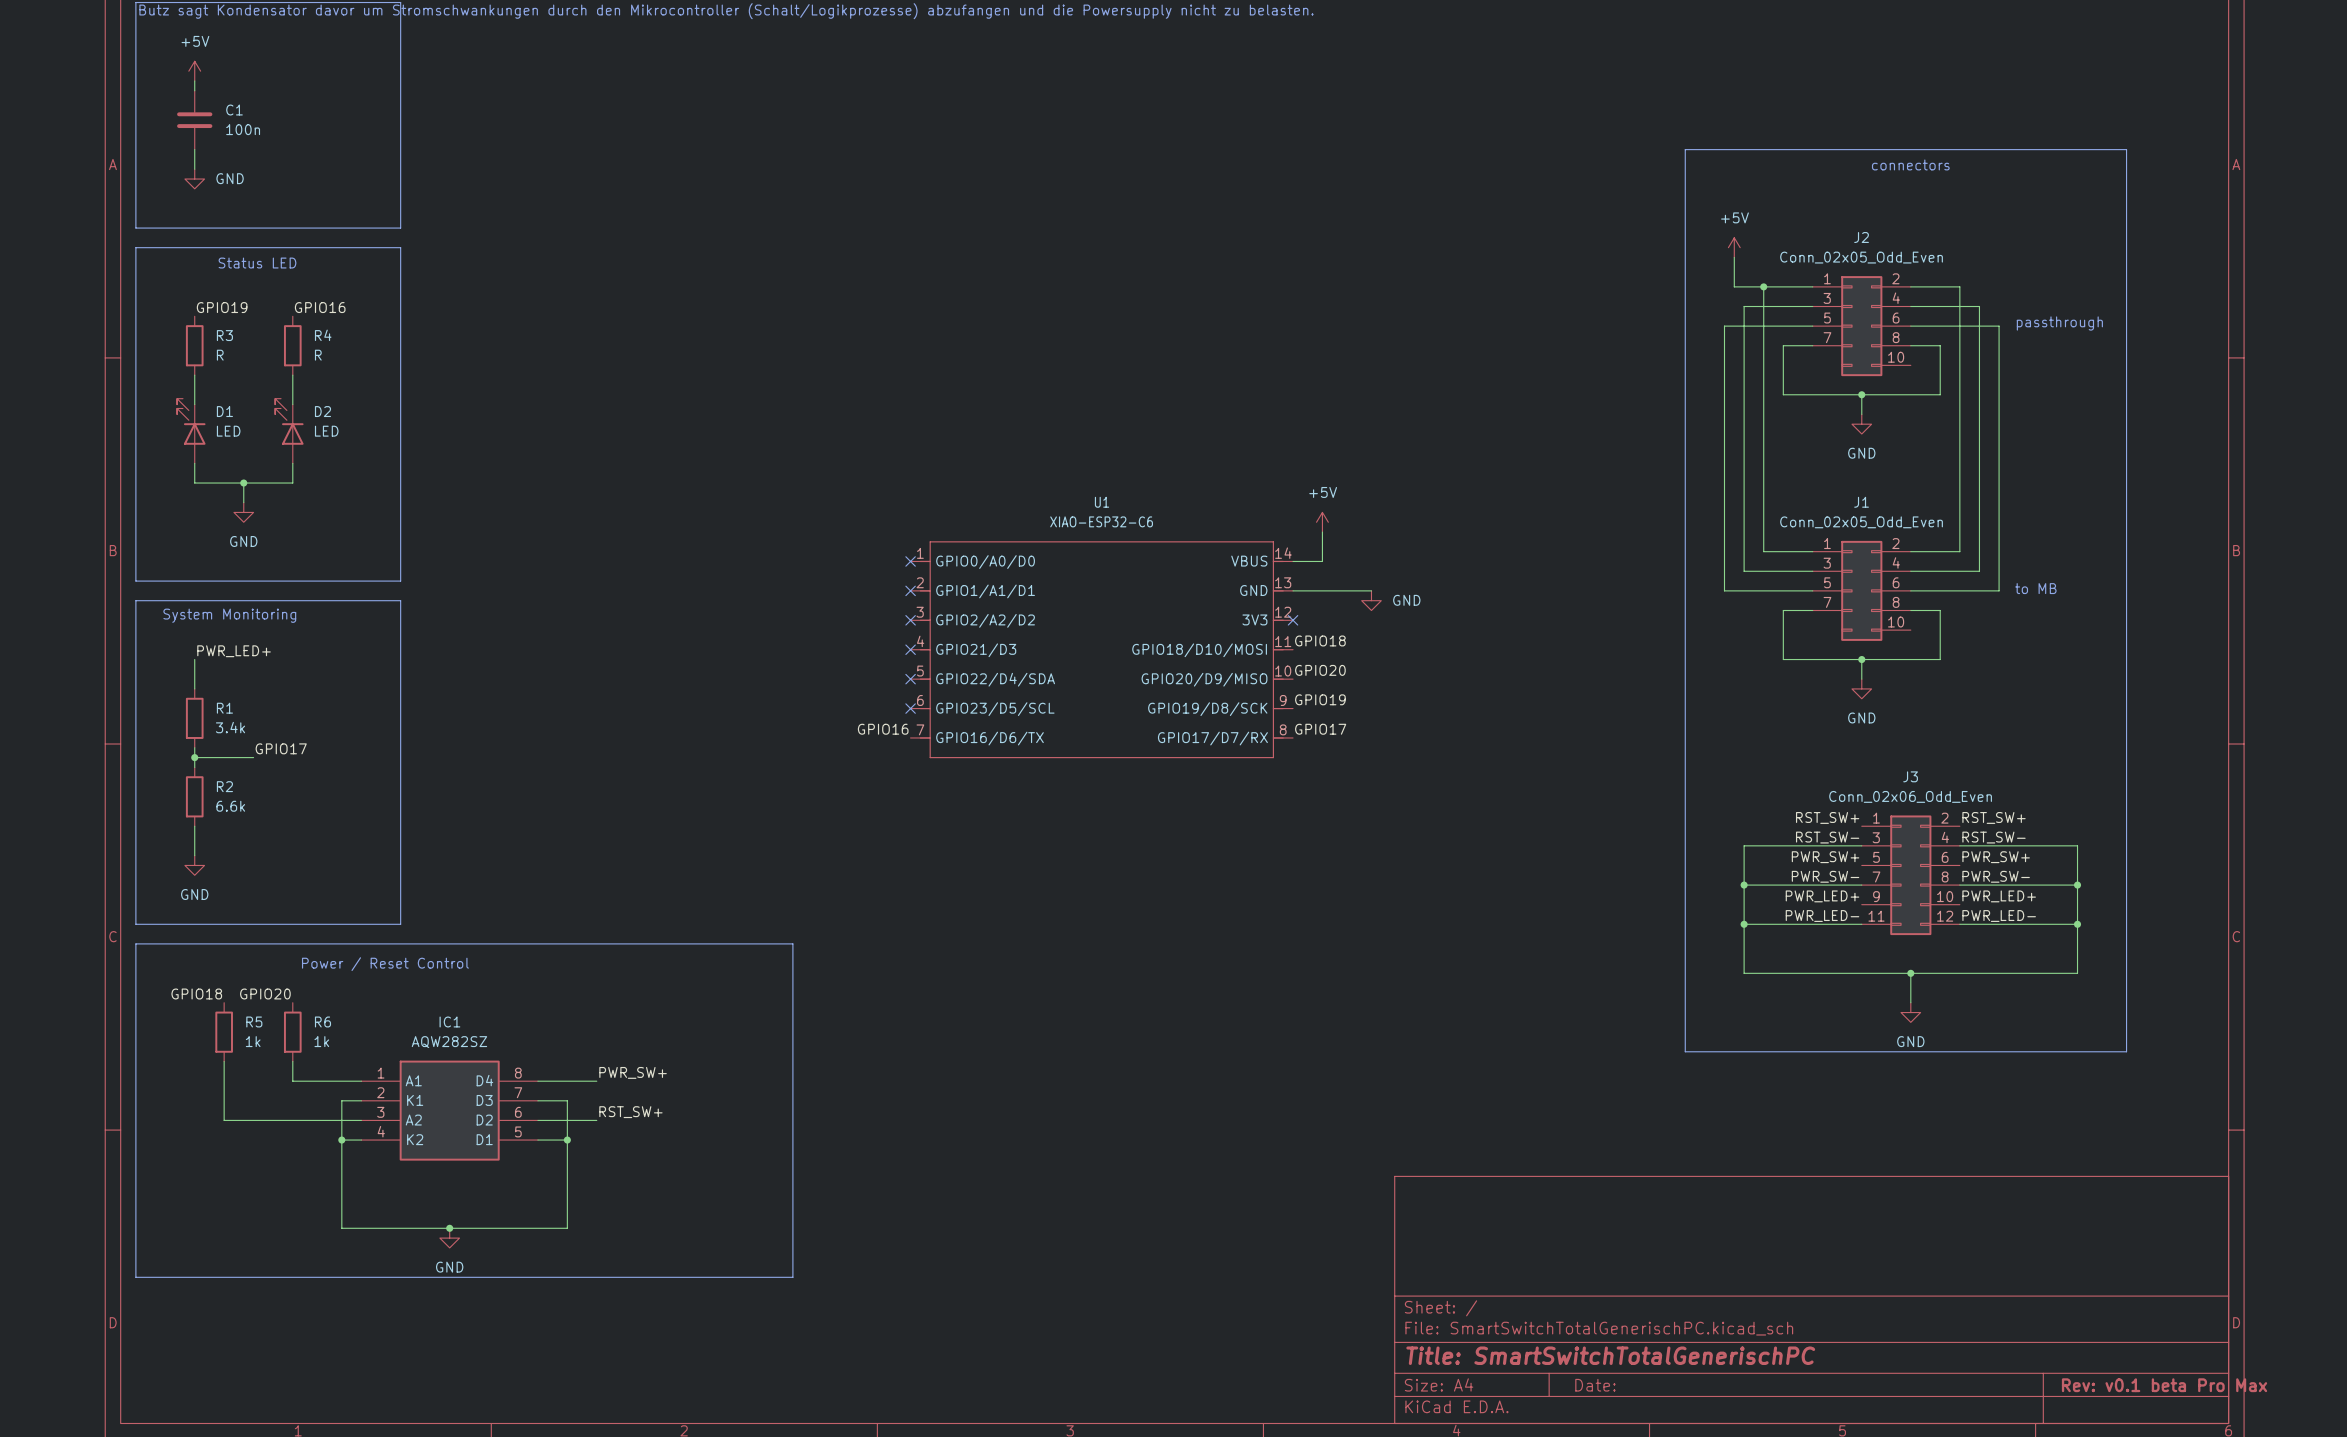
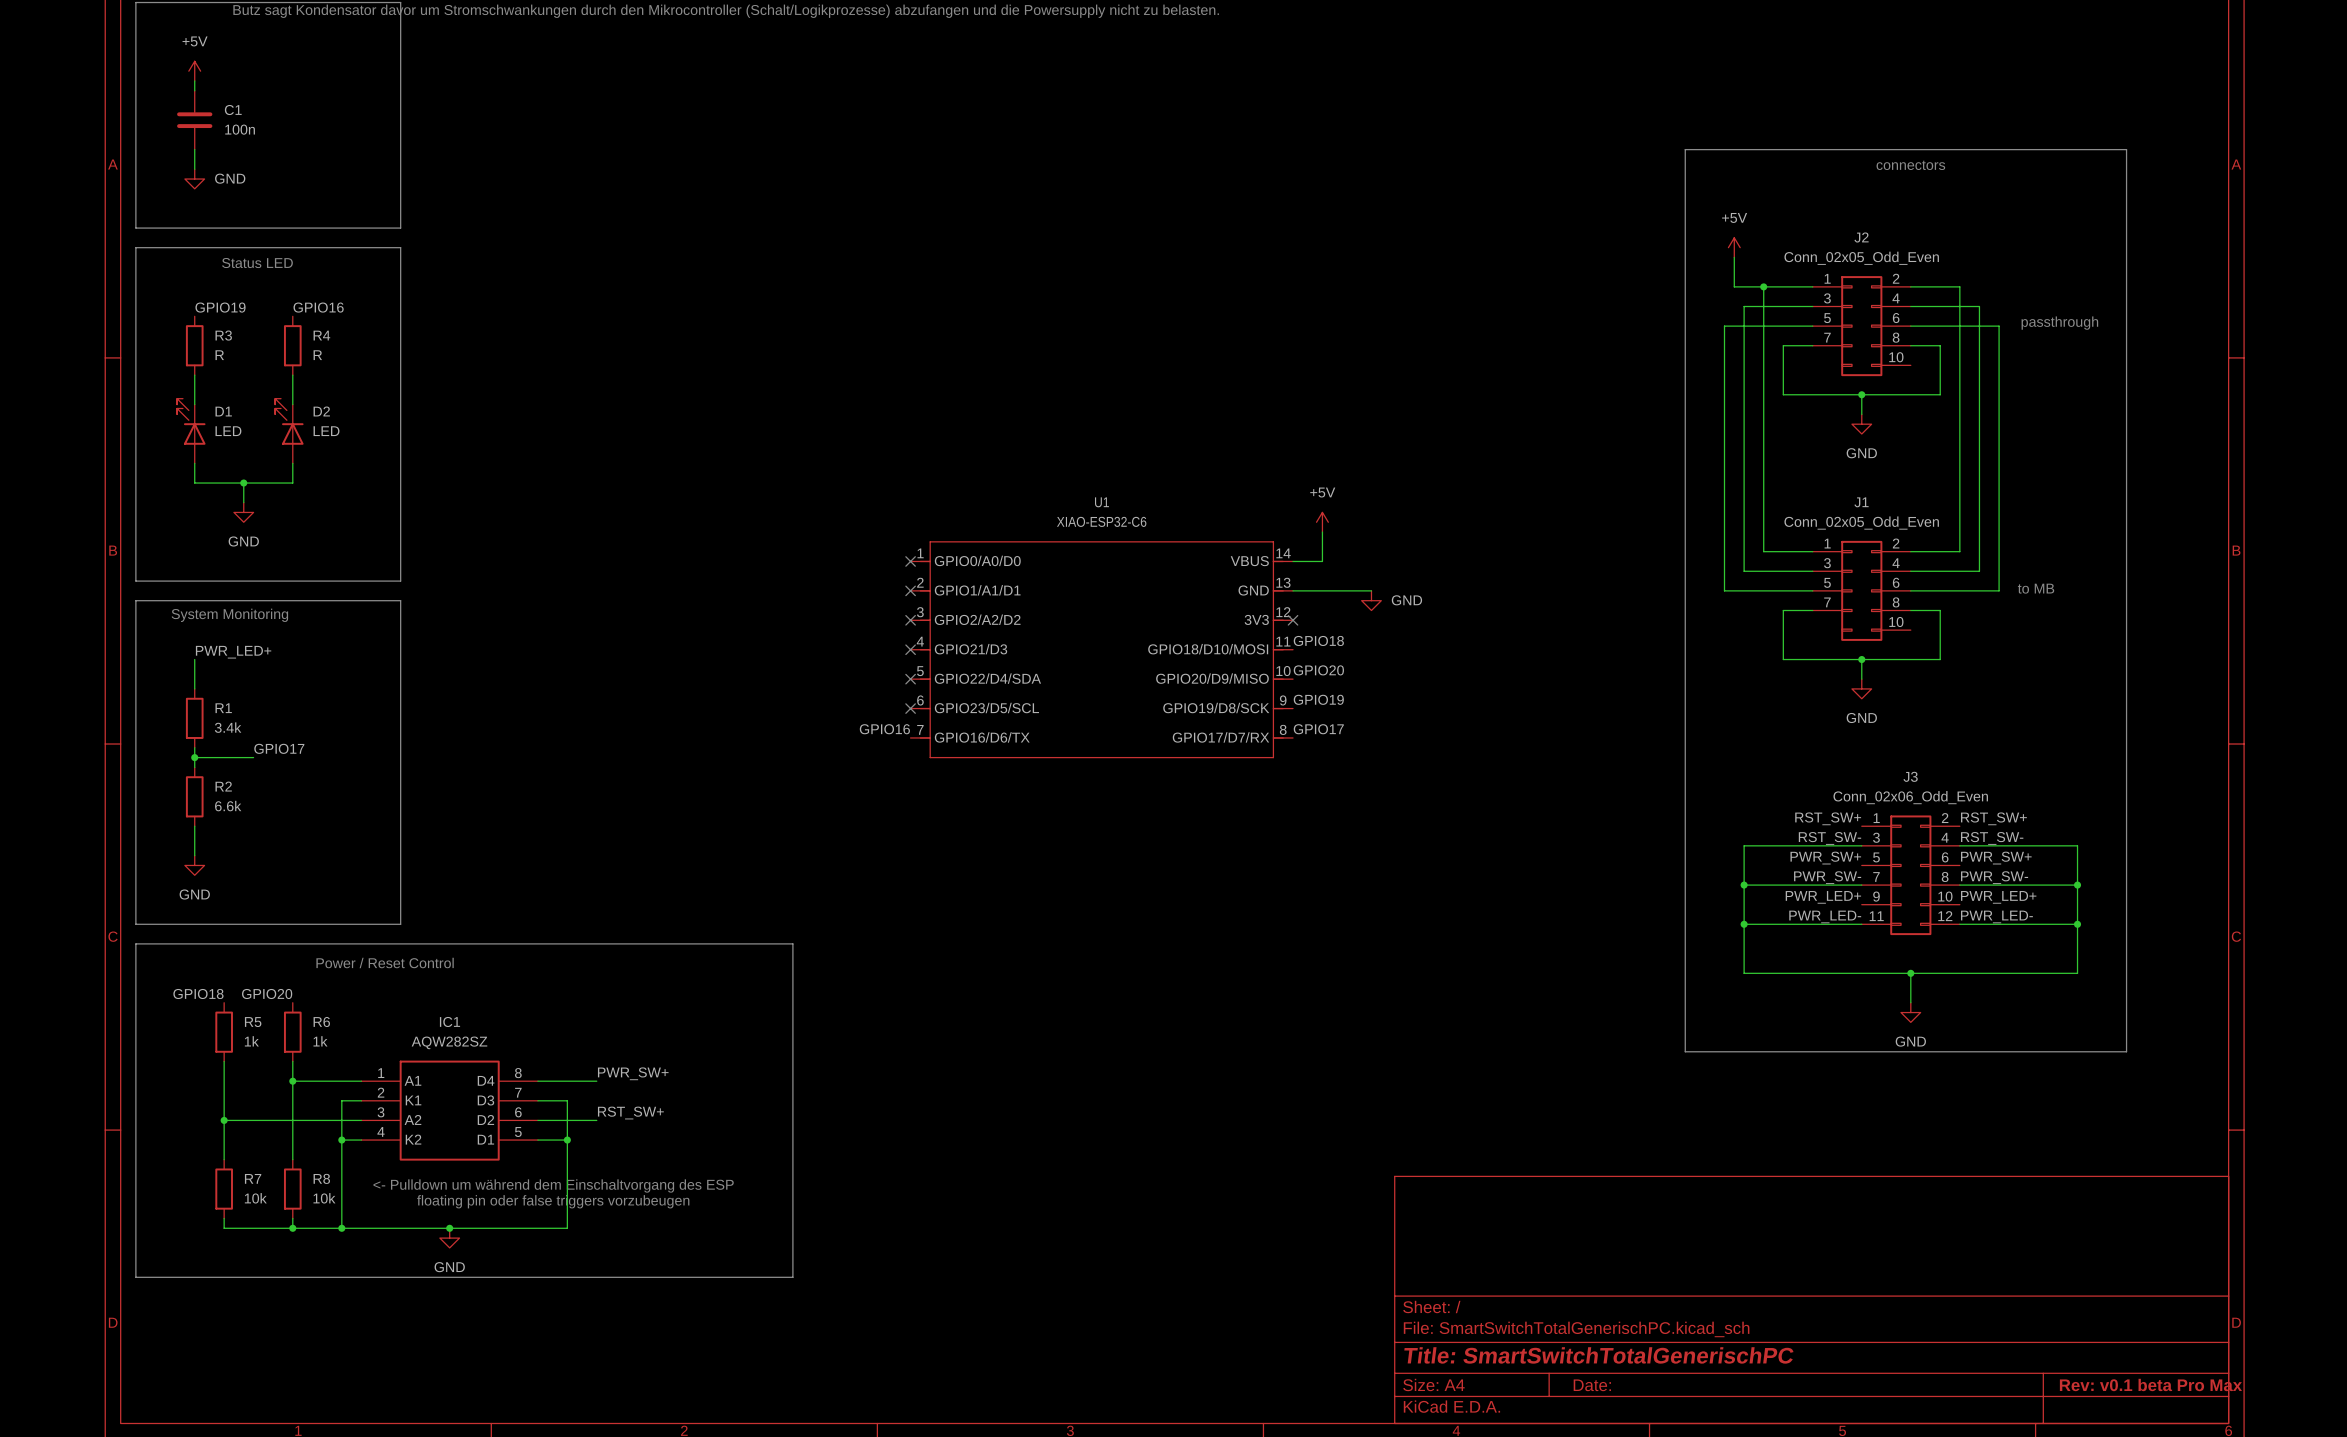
wire: none -> (292, 1081) (292, 1159)
junction: none -> (292, 1081)
wire: none -> (224, 1120) (224, 1159)
junction: none -> (224, 1120)
text: none -> <- Pulldown um während dem Einschaltvorgang des ESP (553, 1185)
R7: none -> 10k (224, 1189)
R8: none -> 10k (292, 1189)
text: none -> floating pin oder false triggers vorzubeugen (553, 1201)
wire: none -> (224, 1218) (224, 1228) (341, 1228)
wire: none -> (292, 1218) (292, 1228)
junction: none -> (292, 1228)
junction: none -> (341, 1228)

